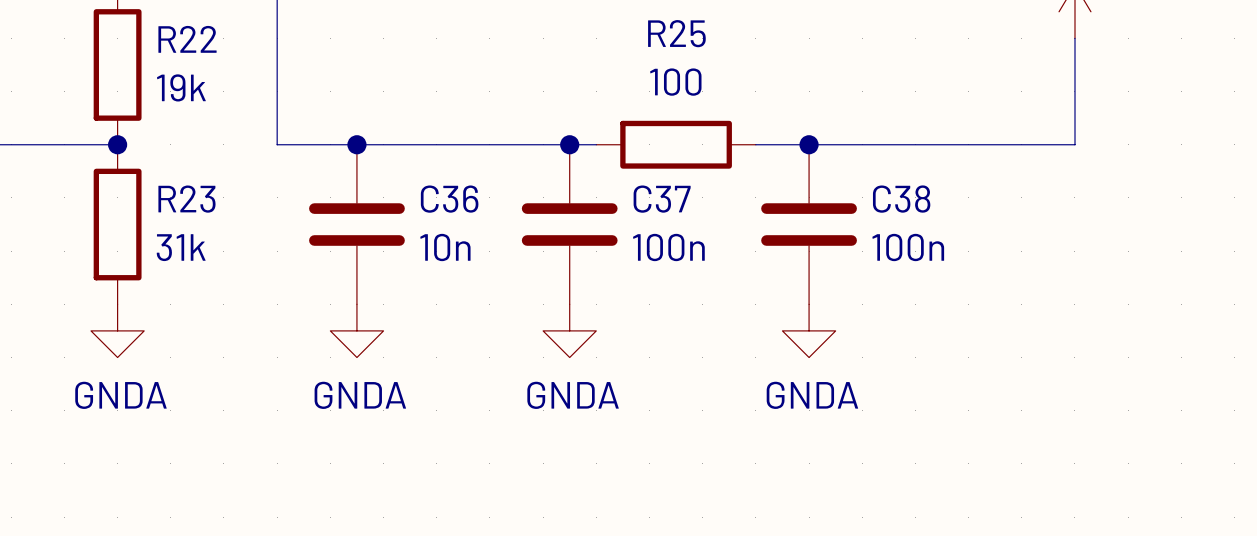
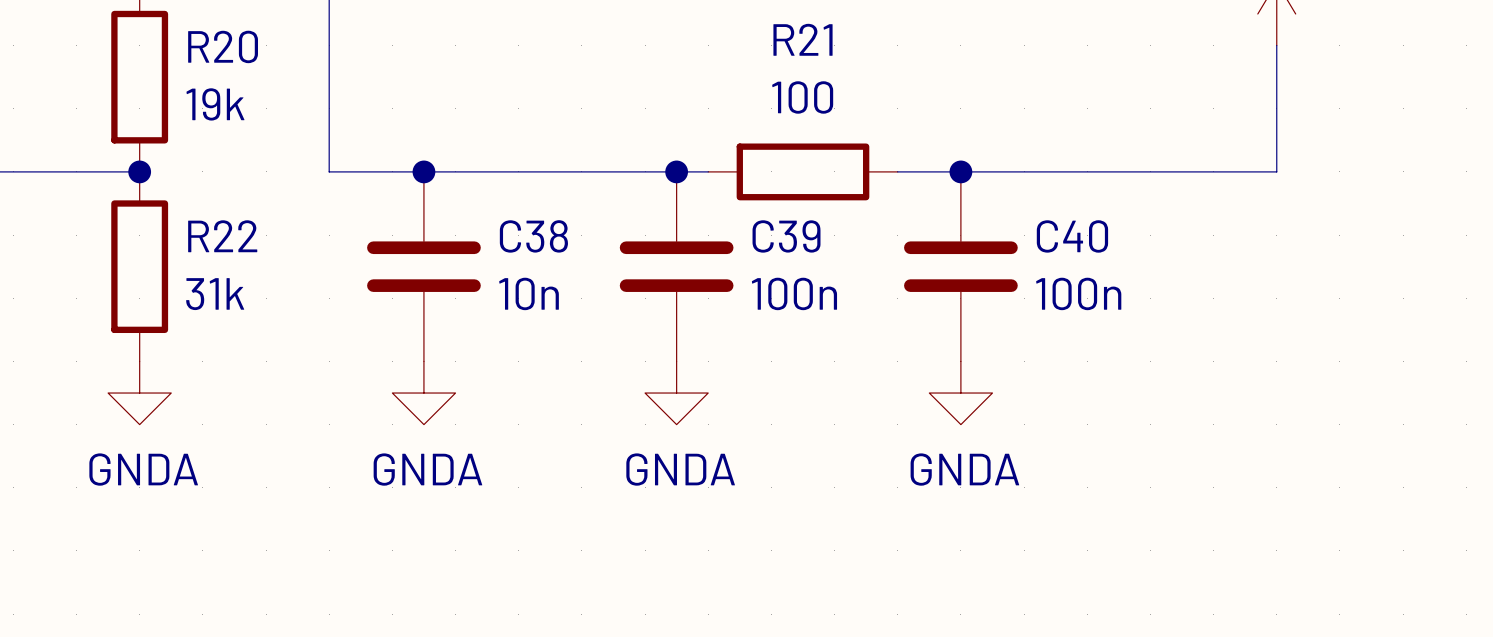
R25 name: R25 (676, 33) -> R21 (803, 39)
R22 name: R22 (187, 39) -> R20 (223, 46)
R23 name: R23 (186, 199) -> R22 (222, 236)
C36 name: C36 (449, 199) -> C38 (533, 236)
C37 name: C37 (662, 199) -> C39 (786, 236)
C38 name: C38 (901, 199) -> C40 (1072, 236)

